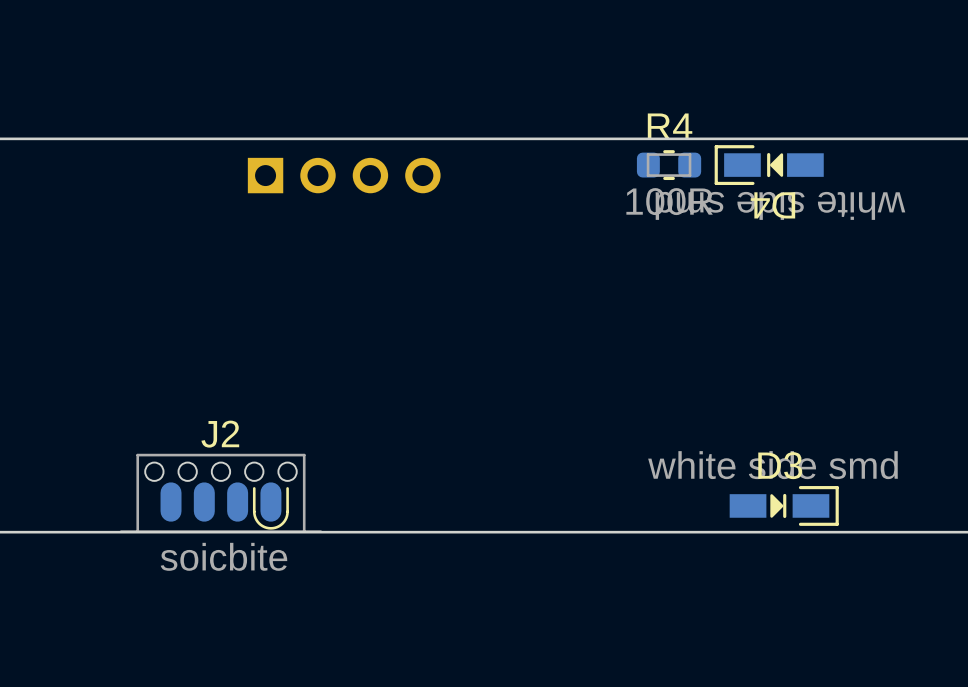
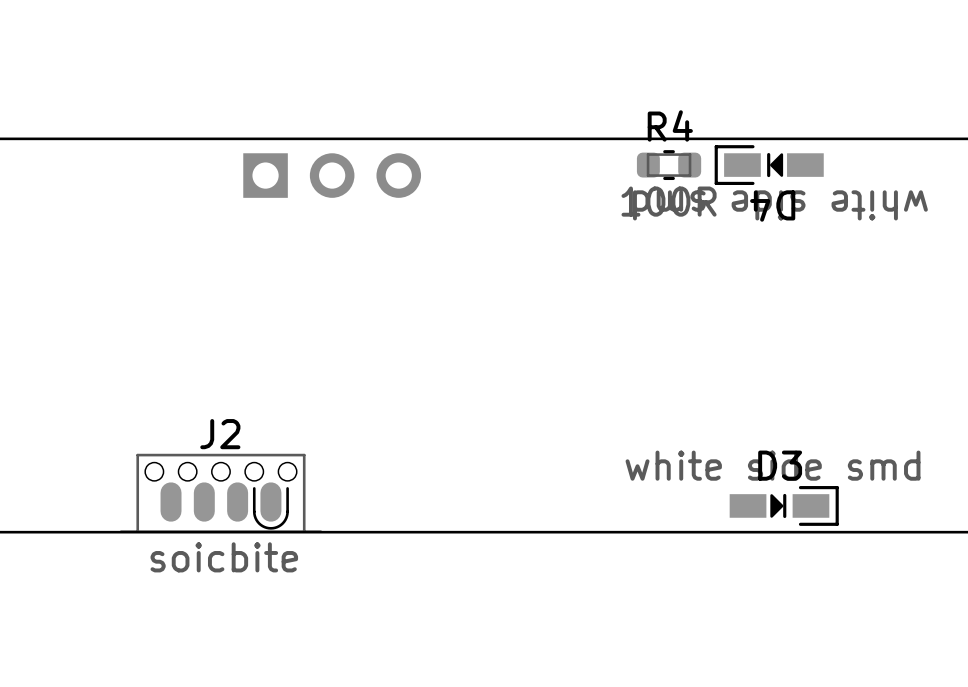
part footprint: [247, 157, 441, 194] -> [243, 153, 422, 198]

